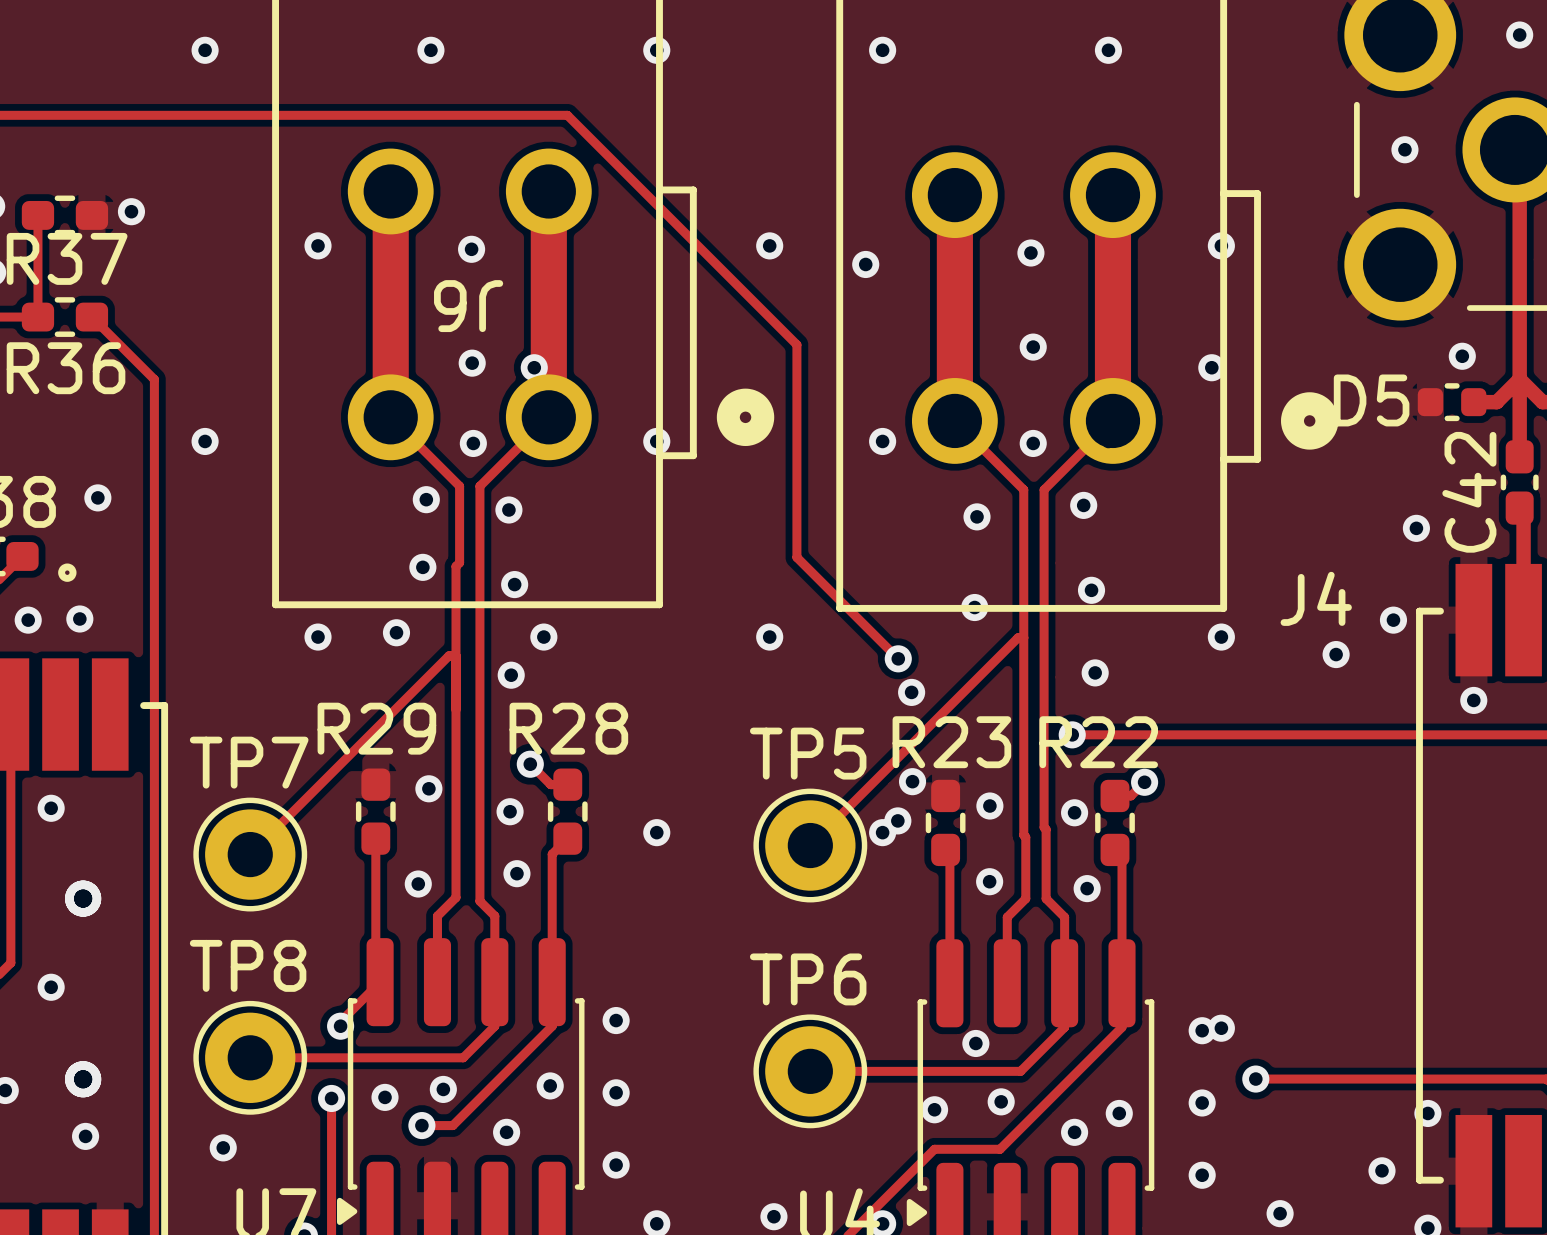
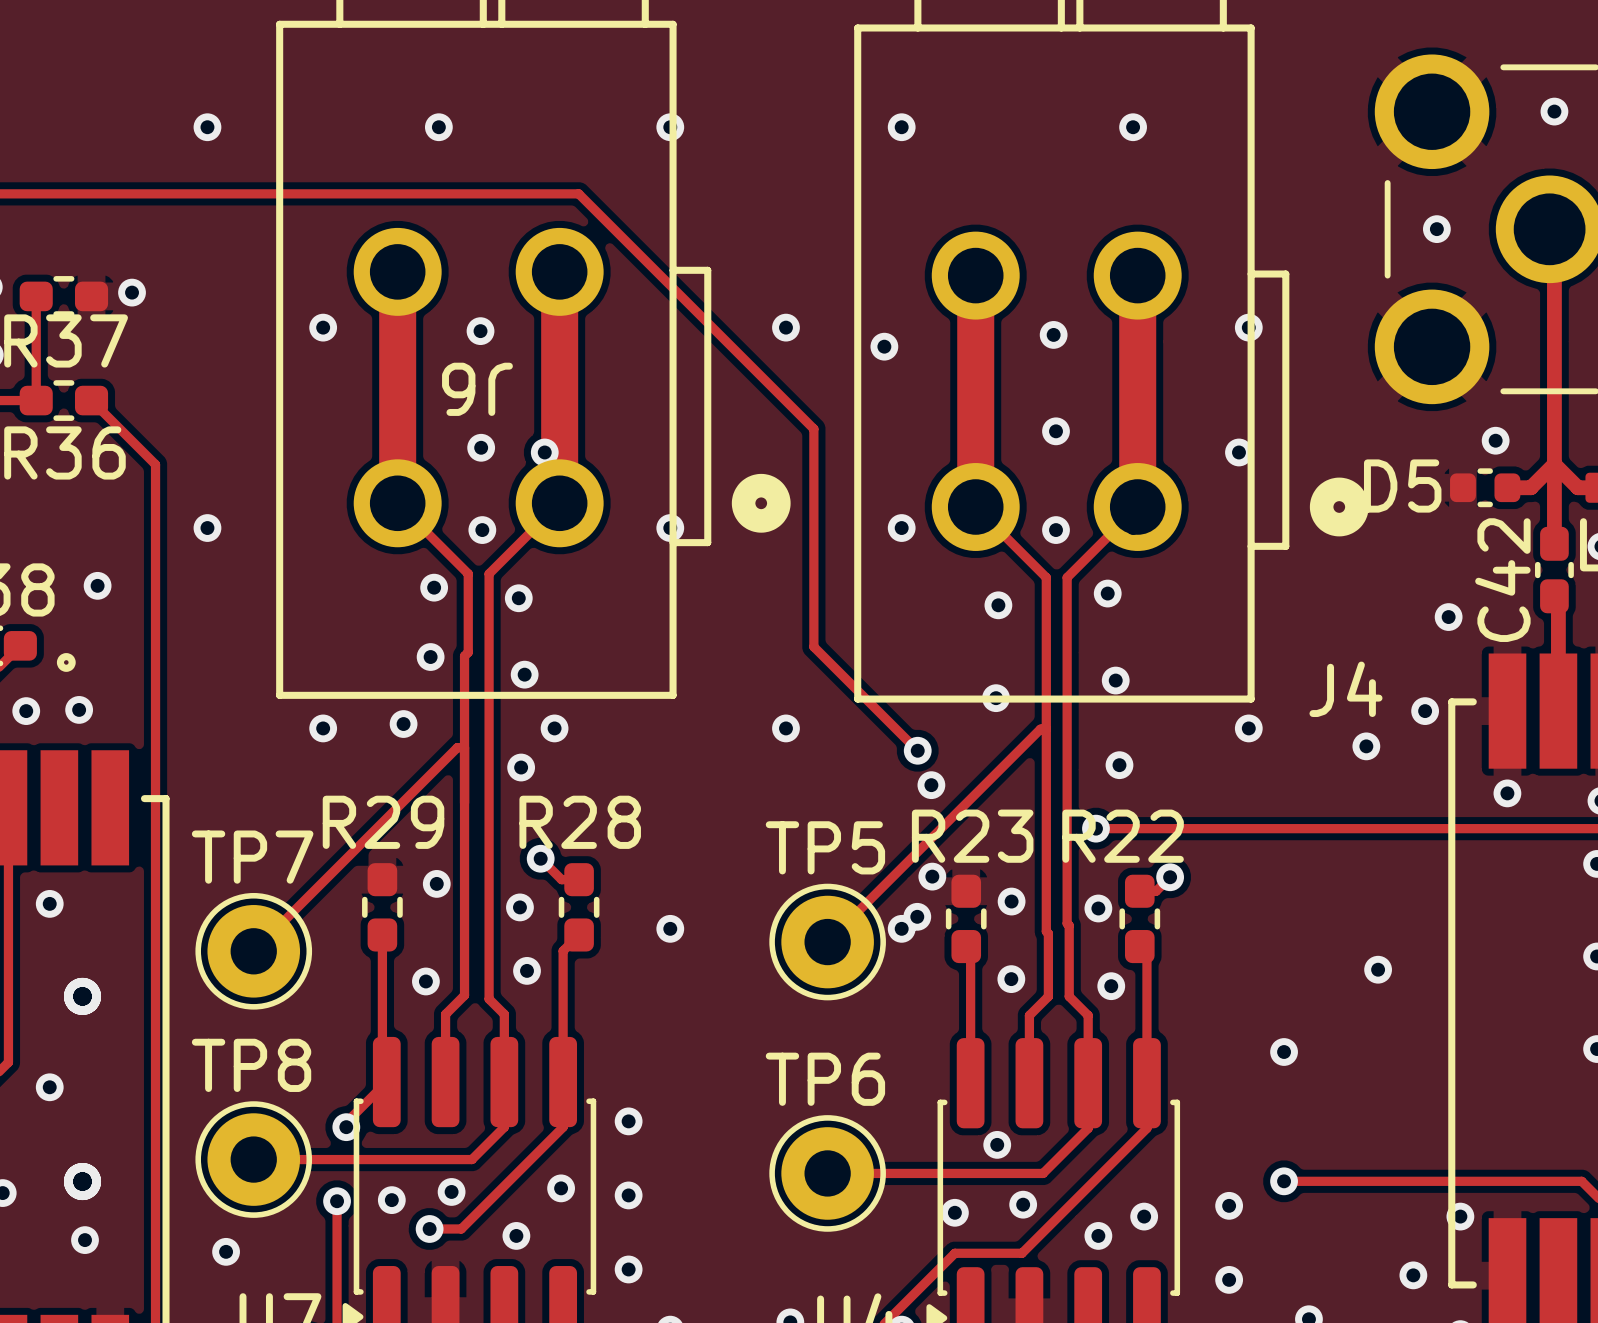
via: none -> (1378, 969)
via: none -> (1284, 1052)
via: (1221, 1028) -> none
via: (1202, 1030) -> none

